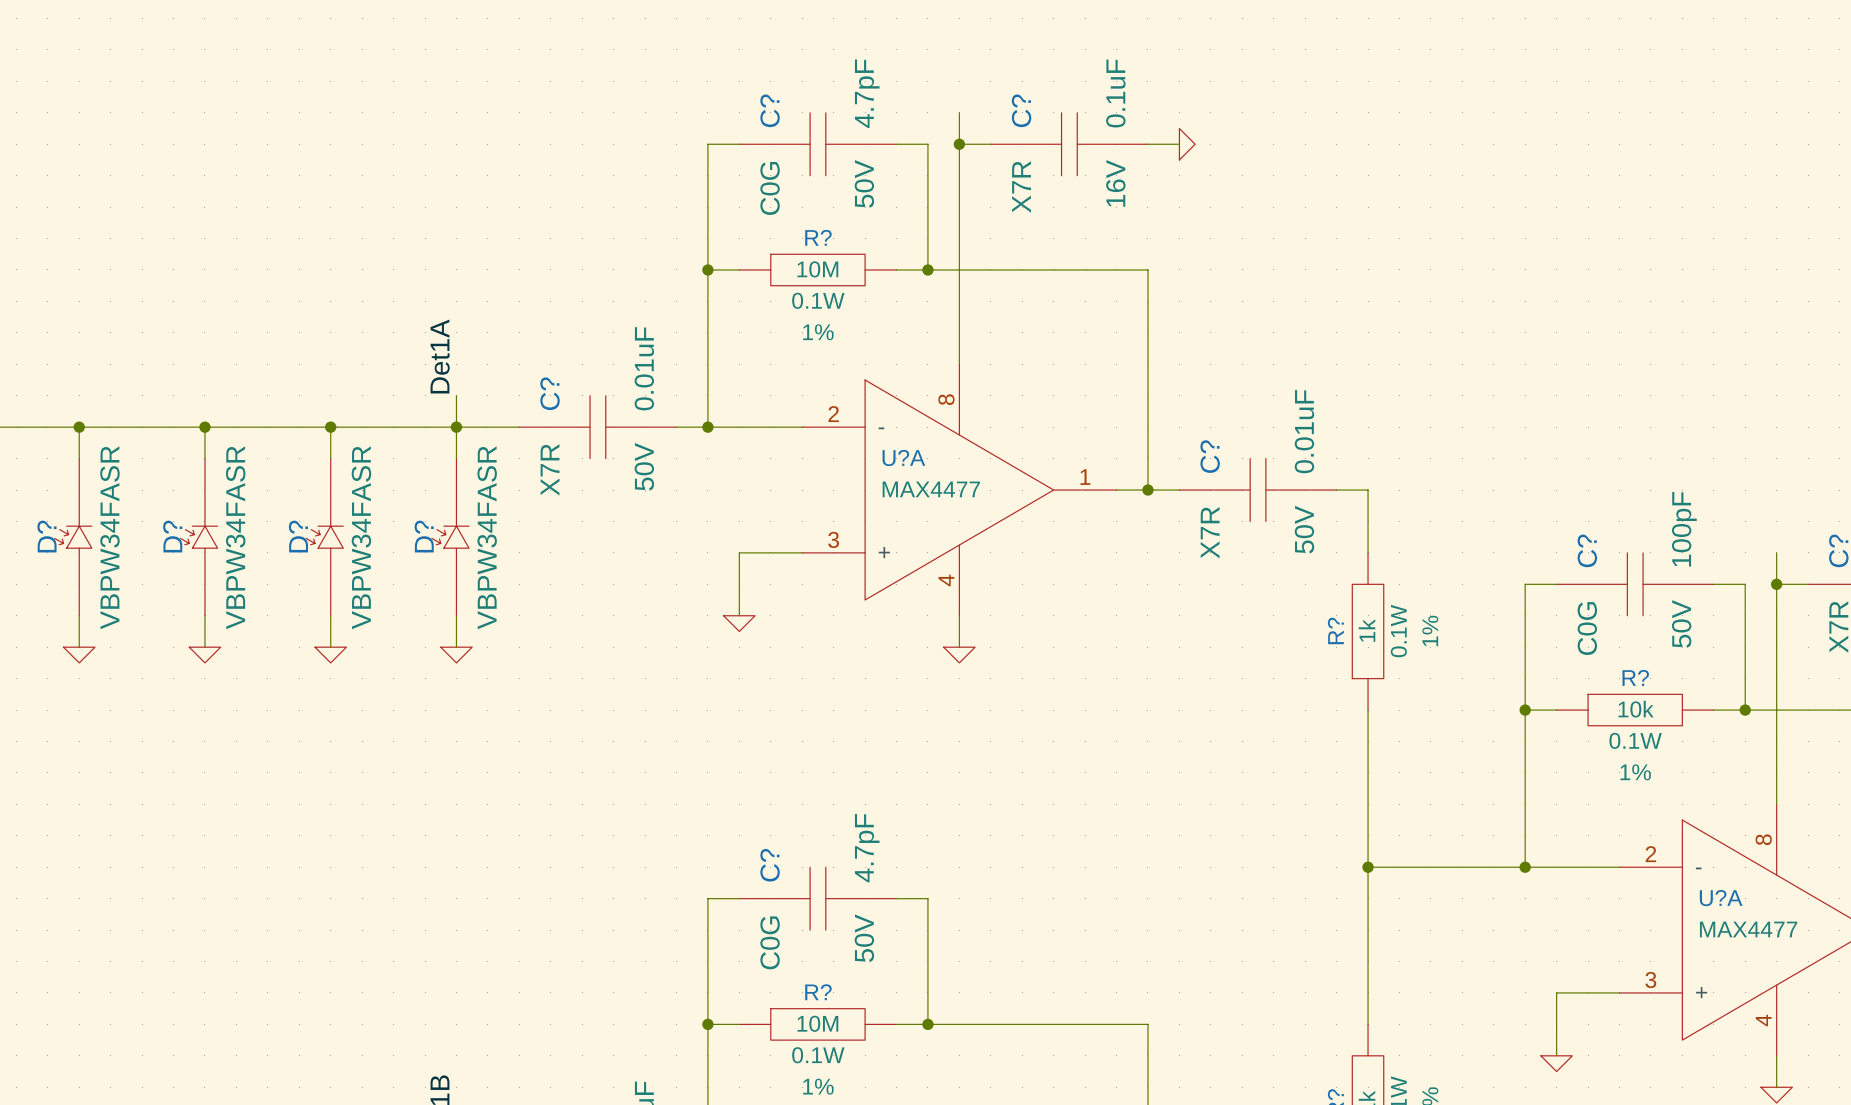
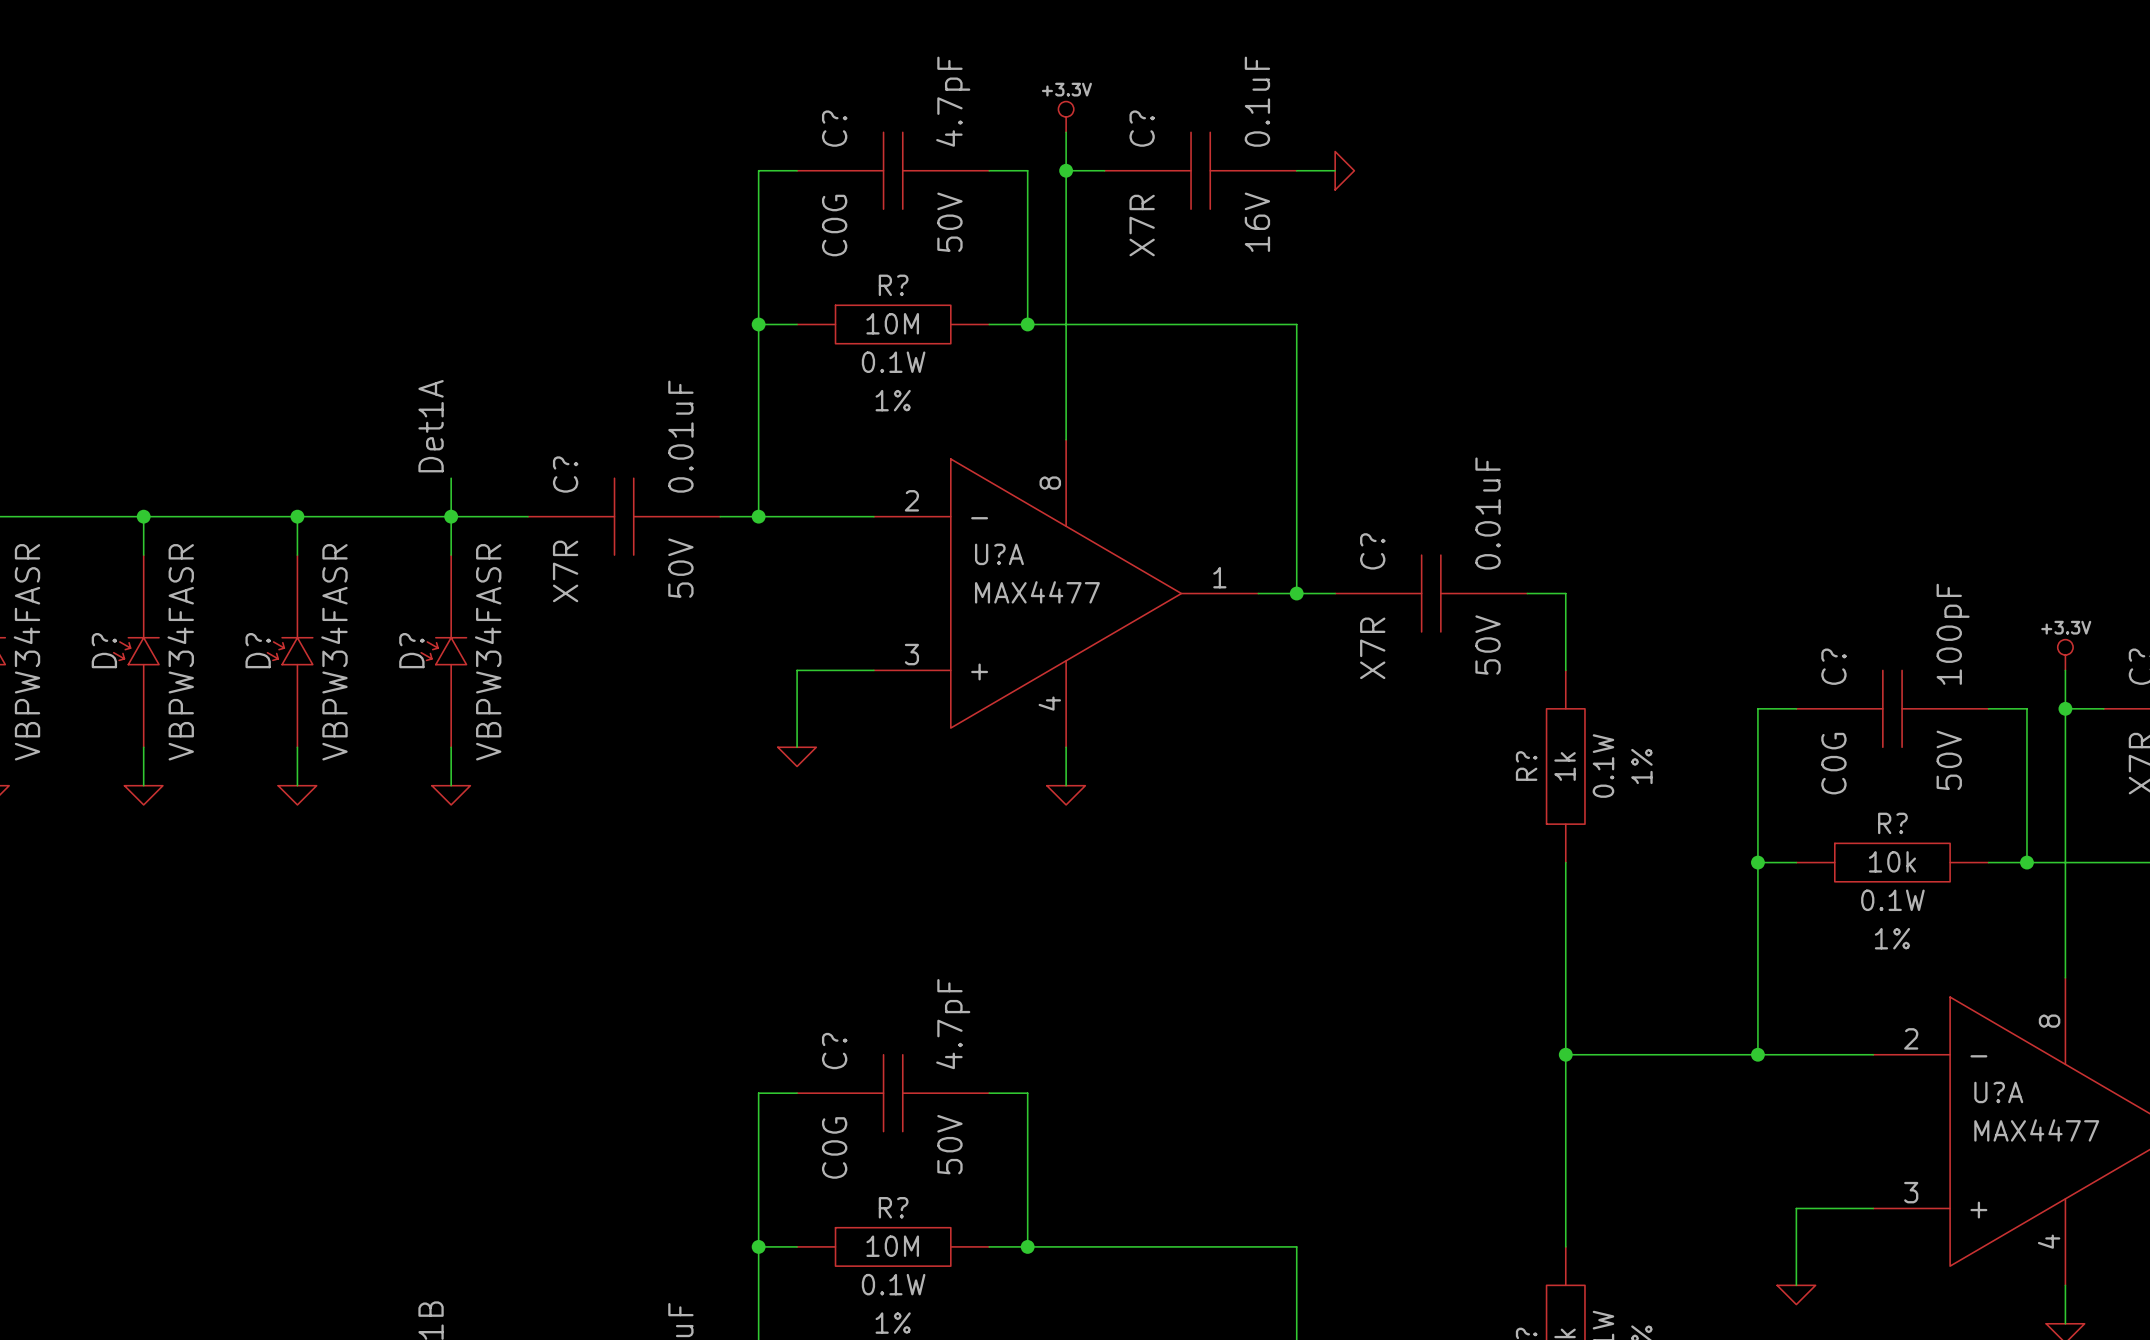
power symbol: none -> +3.3V (1066, 116)
power symbol: none -> +3.3V (2065, 655)

